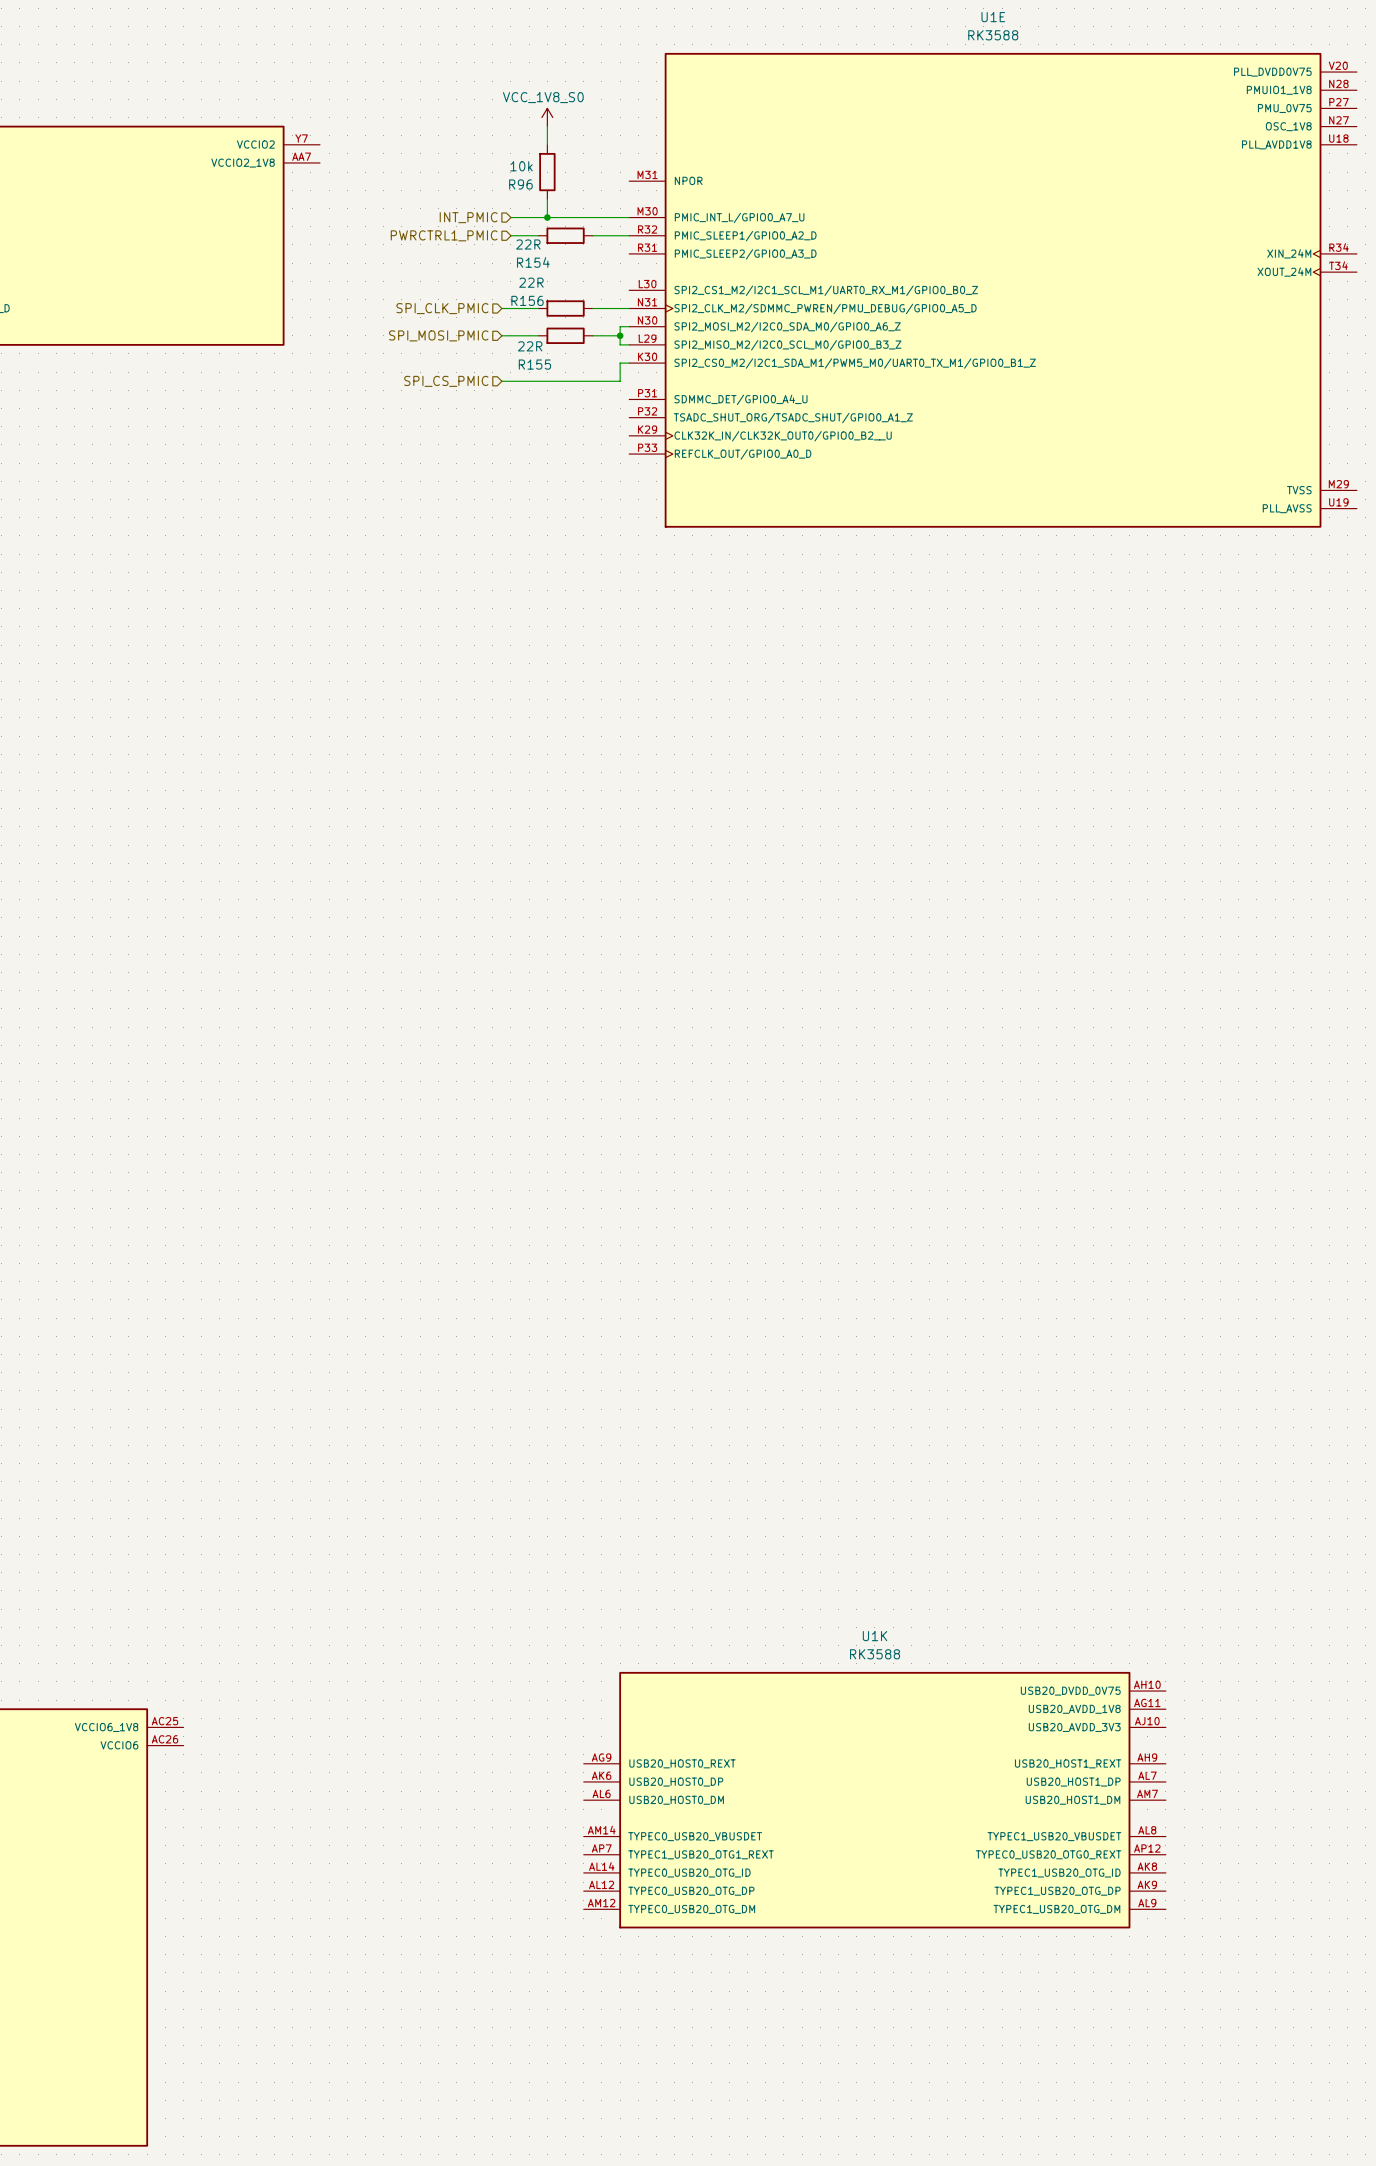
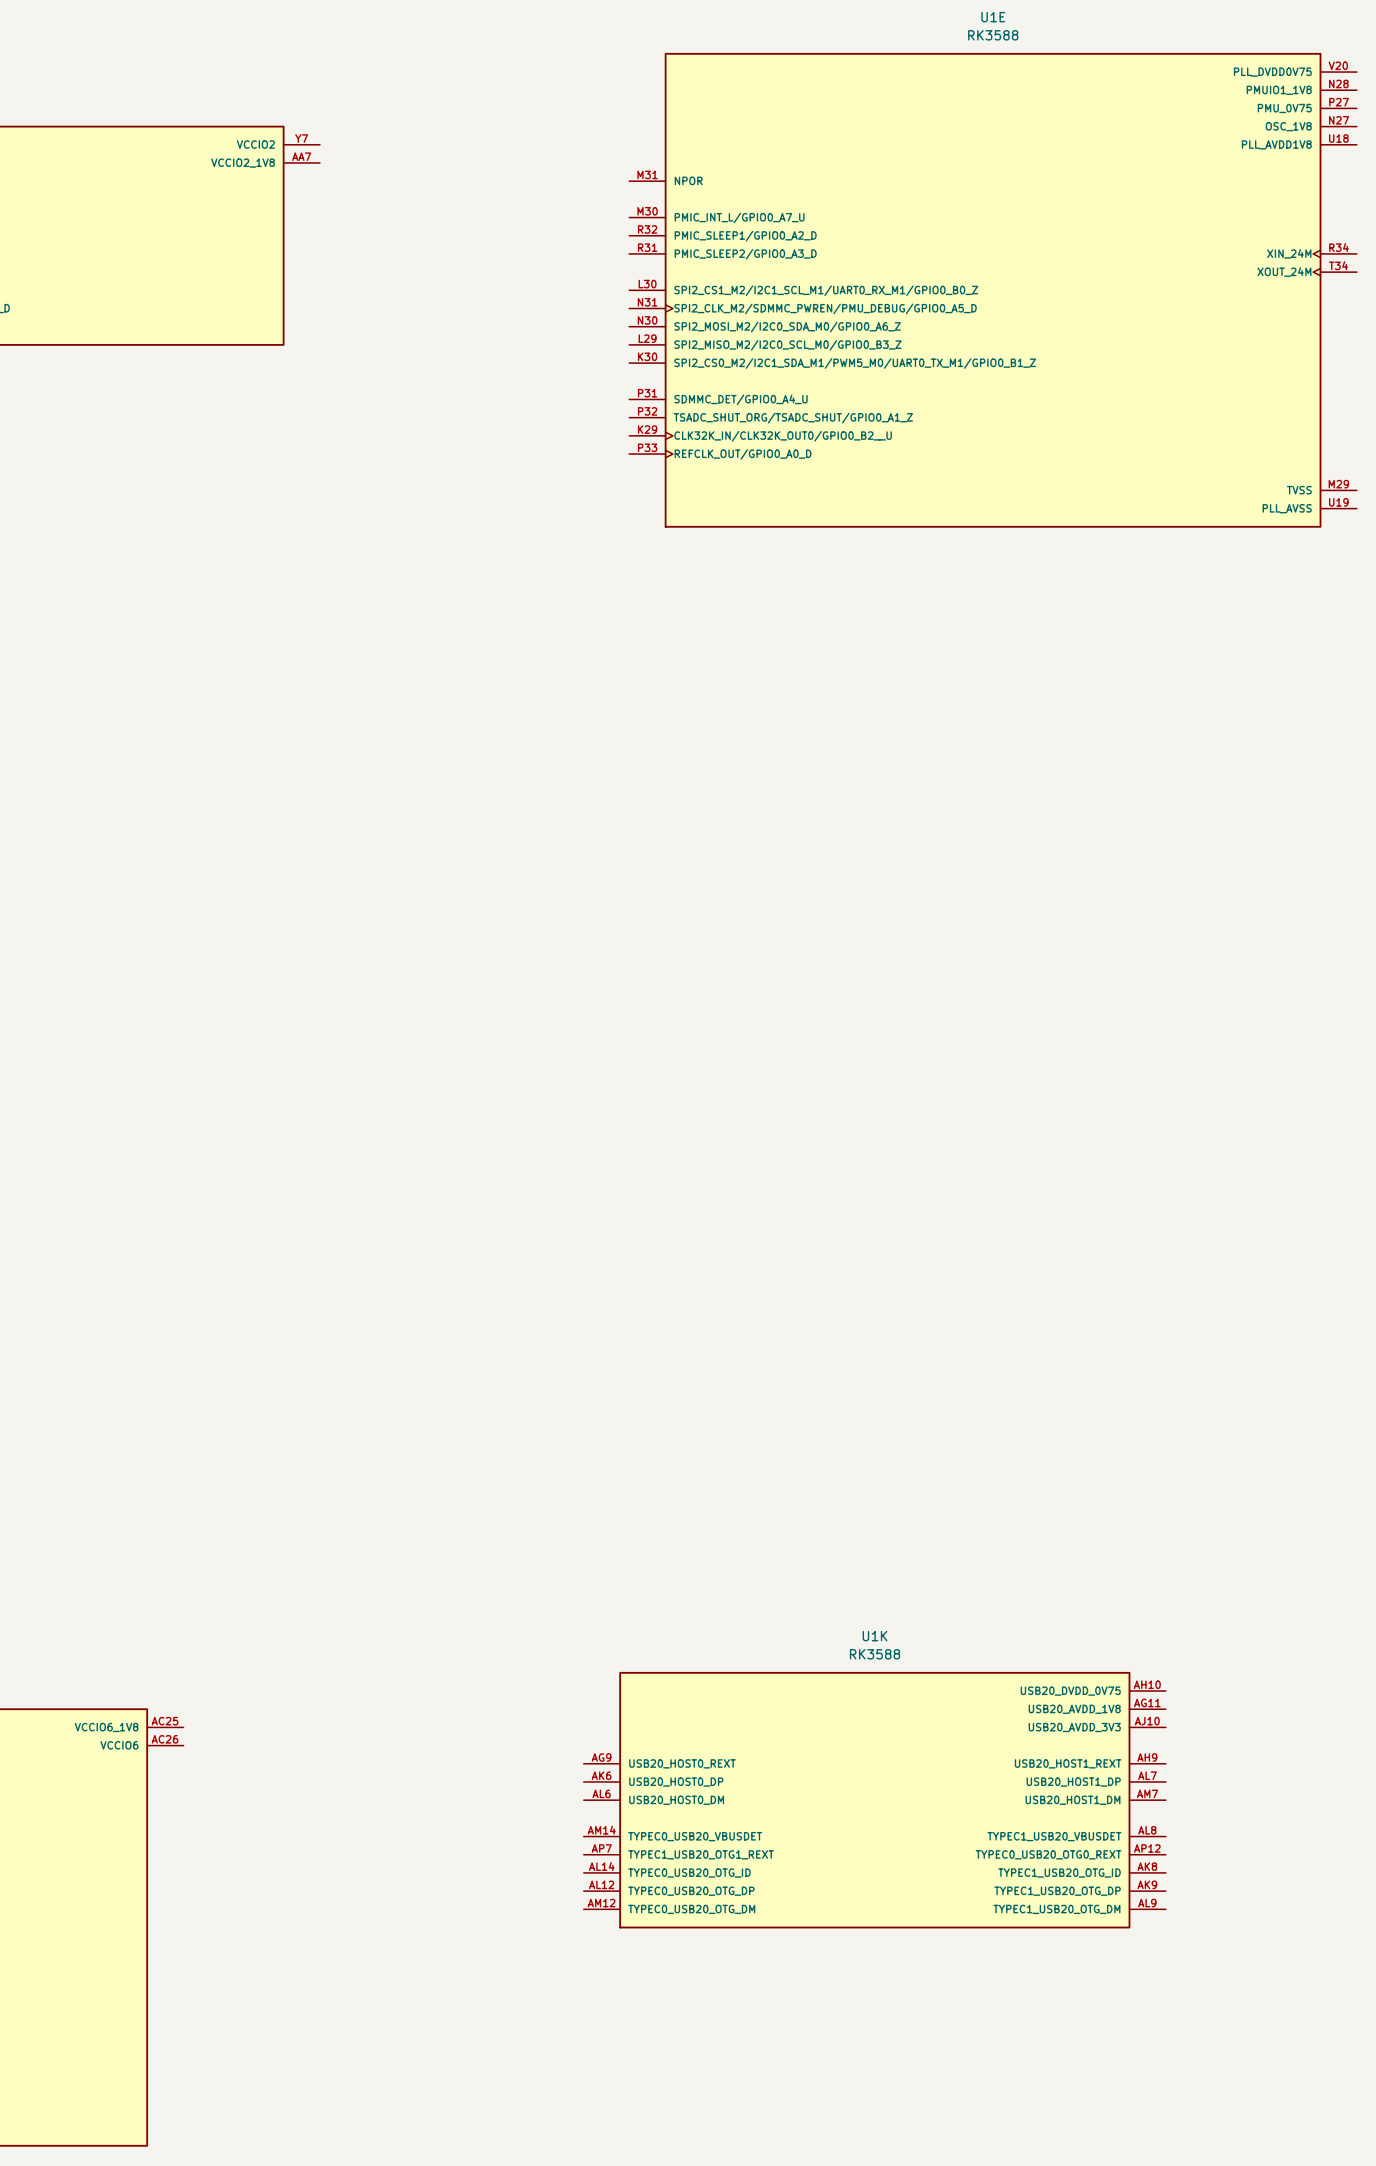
power symbol: VCC_1V8_S0 (547, 117) -> none
wire: (547, 126) (547, 144) -> none
R96: 10k (547, 172) -> none
wire: (547, 199) (547, 217) -> none
hierarchical label: INT_PMIC (468, 217) -> none
wire: (510, 217) (629, 217) -> none
junction: (547, 217) -> none
hierarchical label: PWRCTRL1_PMIC (444, 235) -> none
wire: (510, 235) (538, 235) -> none
R154: 22R (565, 235) -> none
wire: (592, 235) (629, 235) -> none
hierarchical label: SPI_CLK_PMIC (442, 308) -> none
wire: (501, 308) (538, 308) -> none
R156: 22R (565, 308) -> none
wire: (592, 308) (629, 308) -> none
wire: (629, 326) (620, 326) (620, 344) (629, 344) -> none
hierarchical label: SPI_MOSI_PMIC (438, 335) -> none
wire: (501, 335) (538, 335) -> none
R155: 22R (565, 335) -> none
wire: (592, 335) (620, 335) -> none
junction: (620, 335) -> none
wire: (629, 363) (620, 363) (620, 381) (501, 381) -> none
hierarchical label: SPI_CS_PMIC (446, 381) -> none

